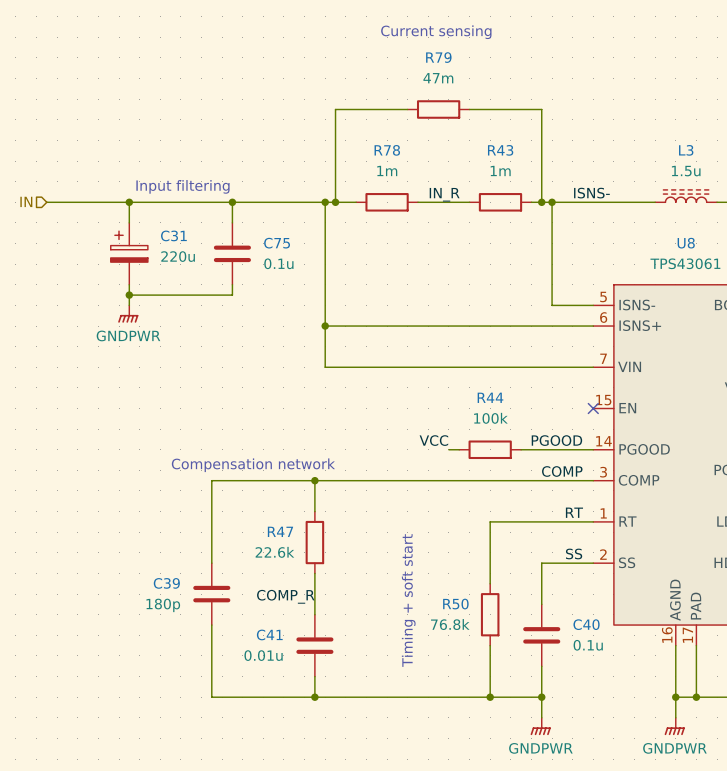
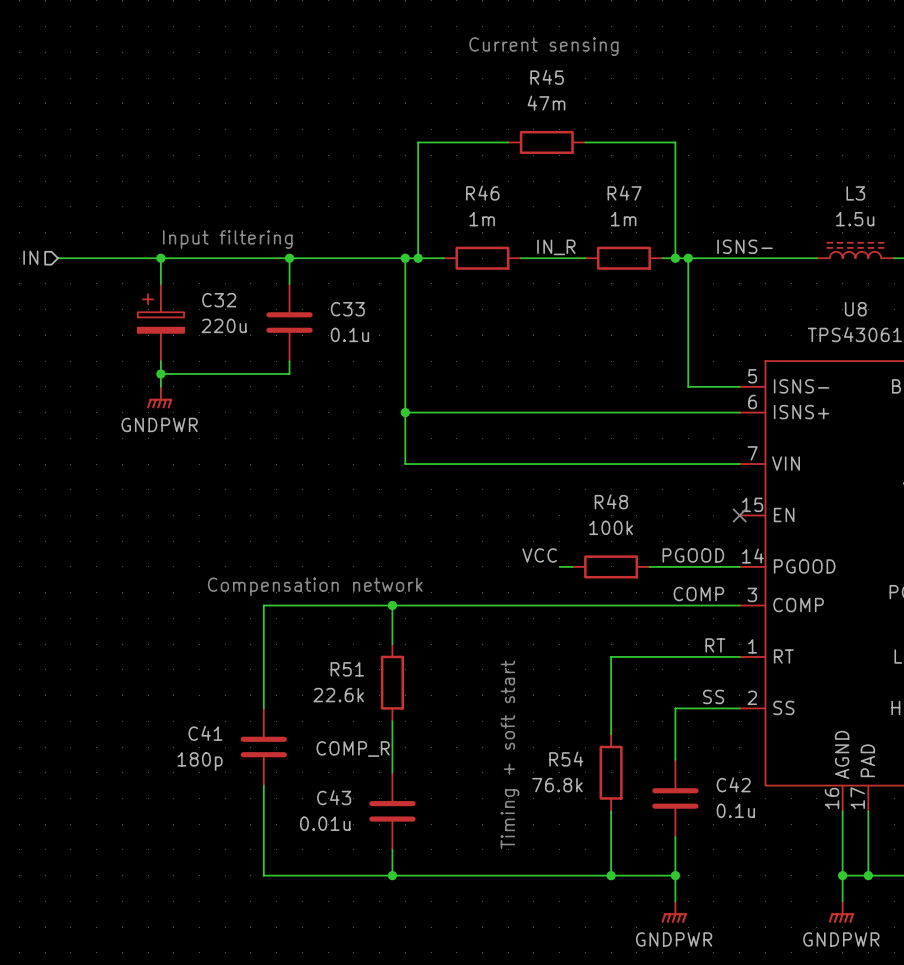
R79 name: R79 (438, 57) -> R45 (547, 77)
R78 name: R78 (387, 150) -> R46 (482, 193)
R43 name: R43 (500, 150) -> R47 (624, 193)
C31 name: C31 (173, 235) -> C32 (219, 300)
C75 name: C75 (277, 243) -> C33 (347, 309)
R44 name: R44 (490, 397) -> R48 (611, 501)
R47 name: R47 (280, 531) -> R51 (347, 669)
C39 name: C39 (166, 583) -> C41 (205, 733)
R50 name: R50 (455, 604) -> R54 (566, 759)
C40 name: C40 (586, 624) -> C42 (733, 784)
C41 name: C41 (269, 634) -> C43 (334, 797)

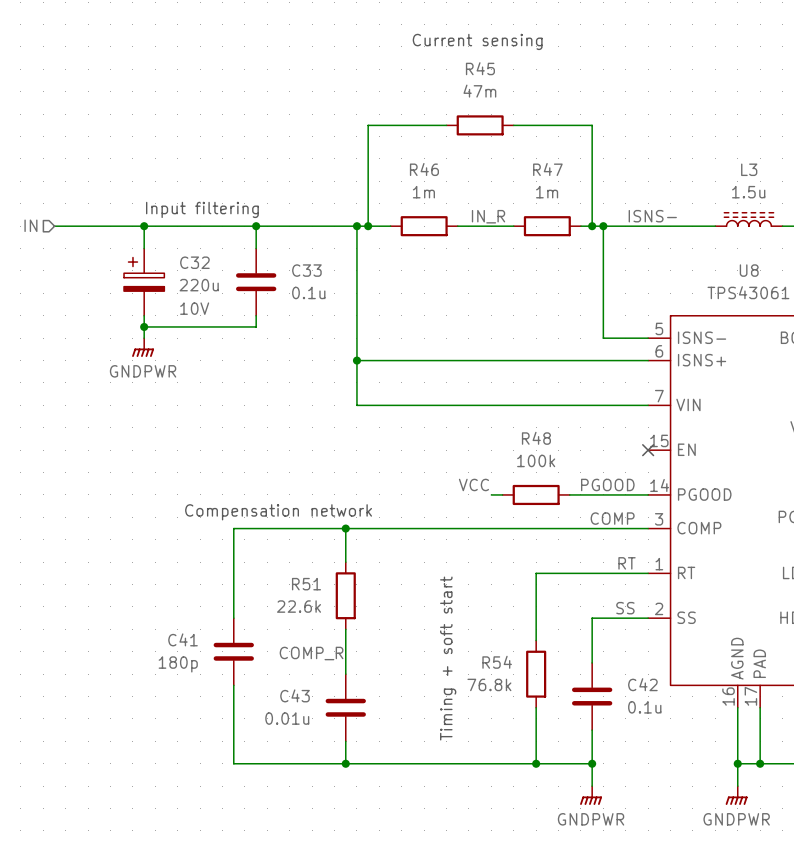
C32 text: none -> 10V (194, 308)

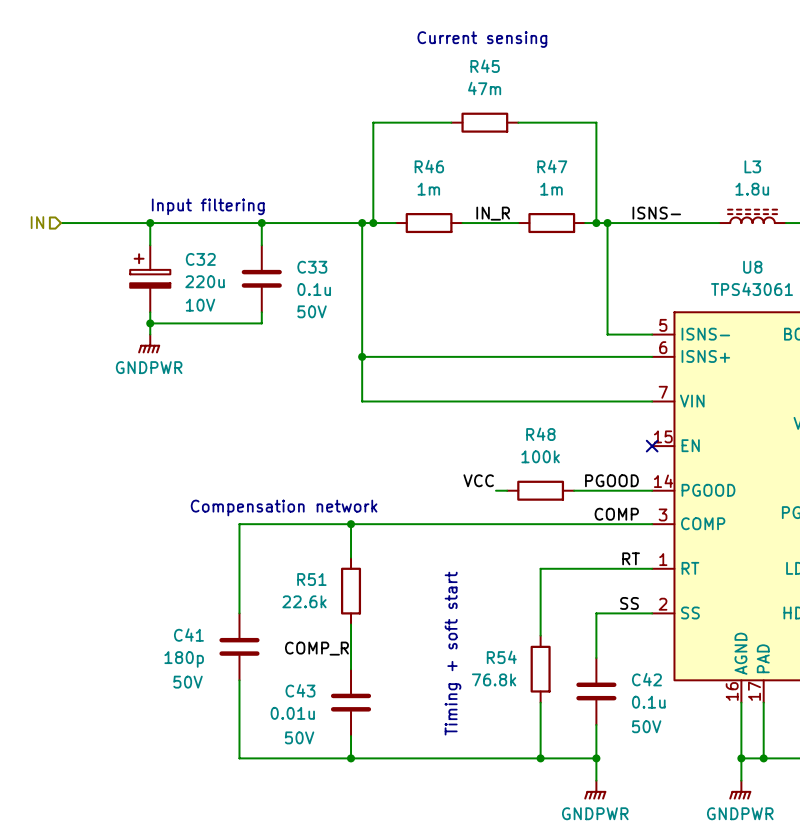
L3 value: 1.5u (748, 192) -> 1.8u (752, 189)
C33 text: none -> 50V (312, 311)
C41 text: none -> 50V (188, 682)
C42 text: none -> 50V (646, 726)
C43 text: none -> 50V (299, 737)

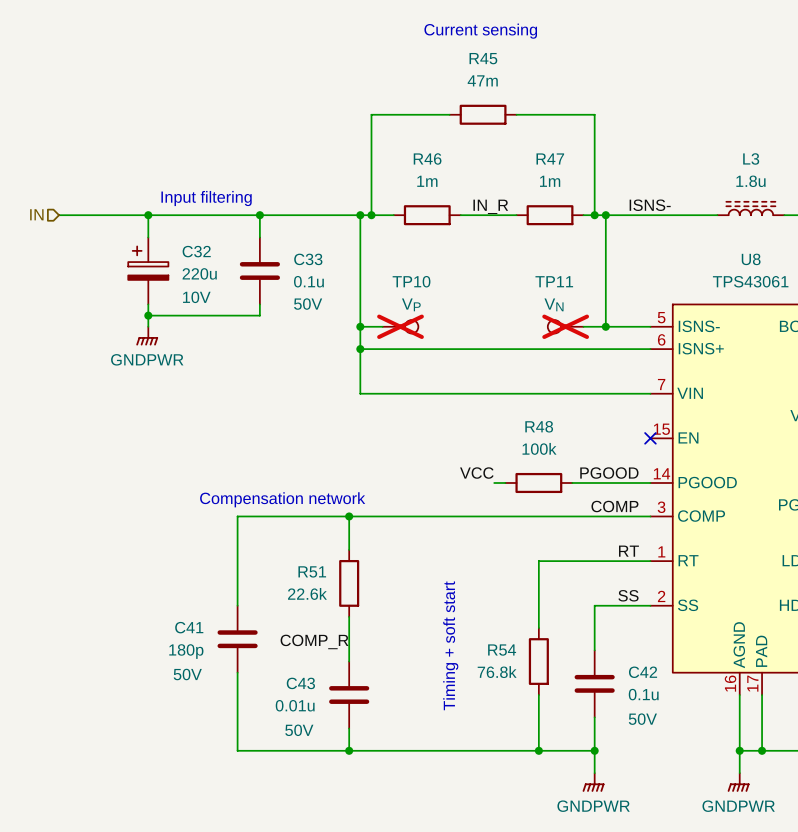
wire: none -> (360, 326) (382, 326)
junction: none -> (360, 326)
TP10: none -> VP (400, 326)
TP11: none -> VN (565, 326)
wire: none -> (583, 326) (605, 326)
junction: none -> (605, 326)

